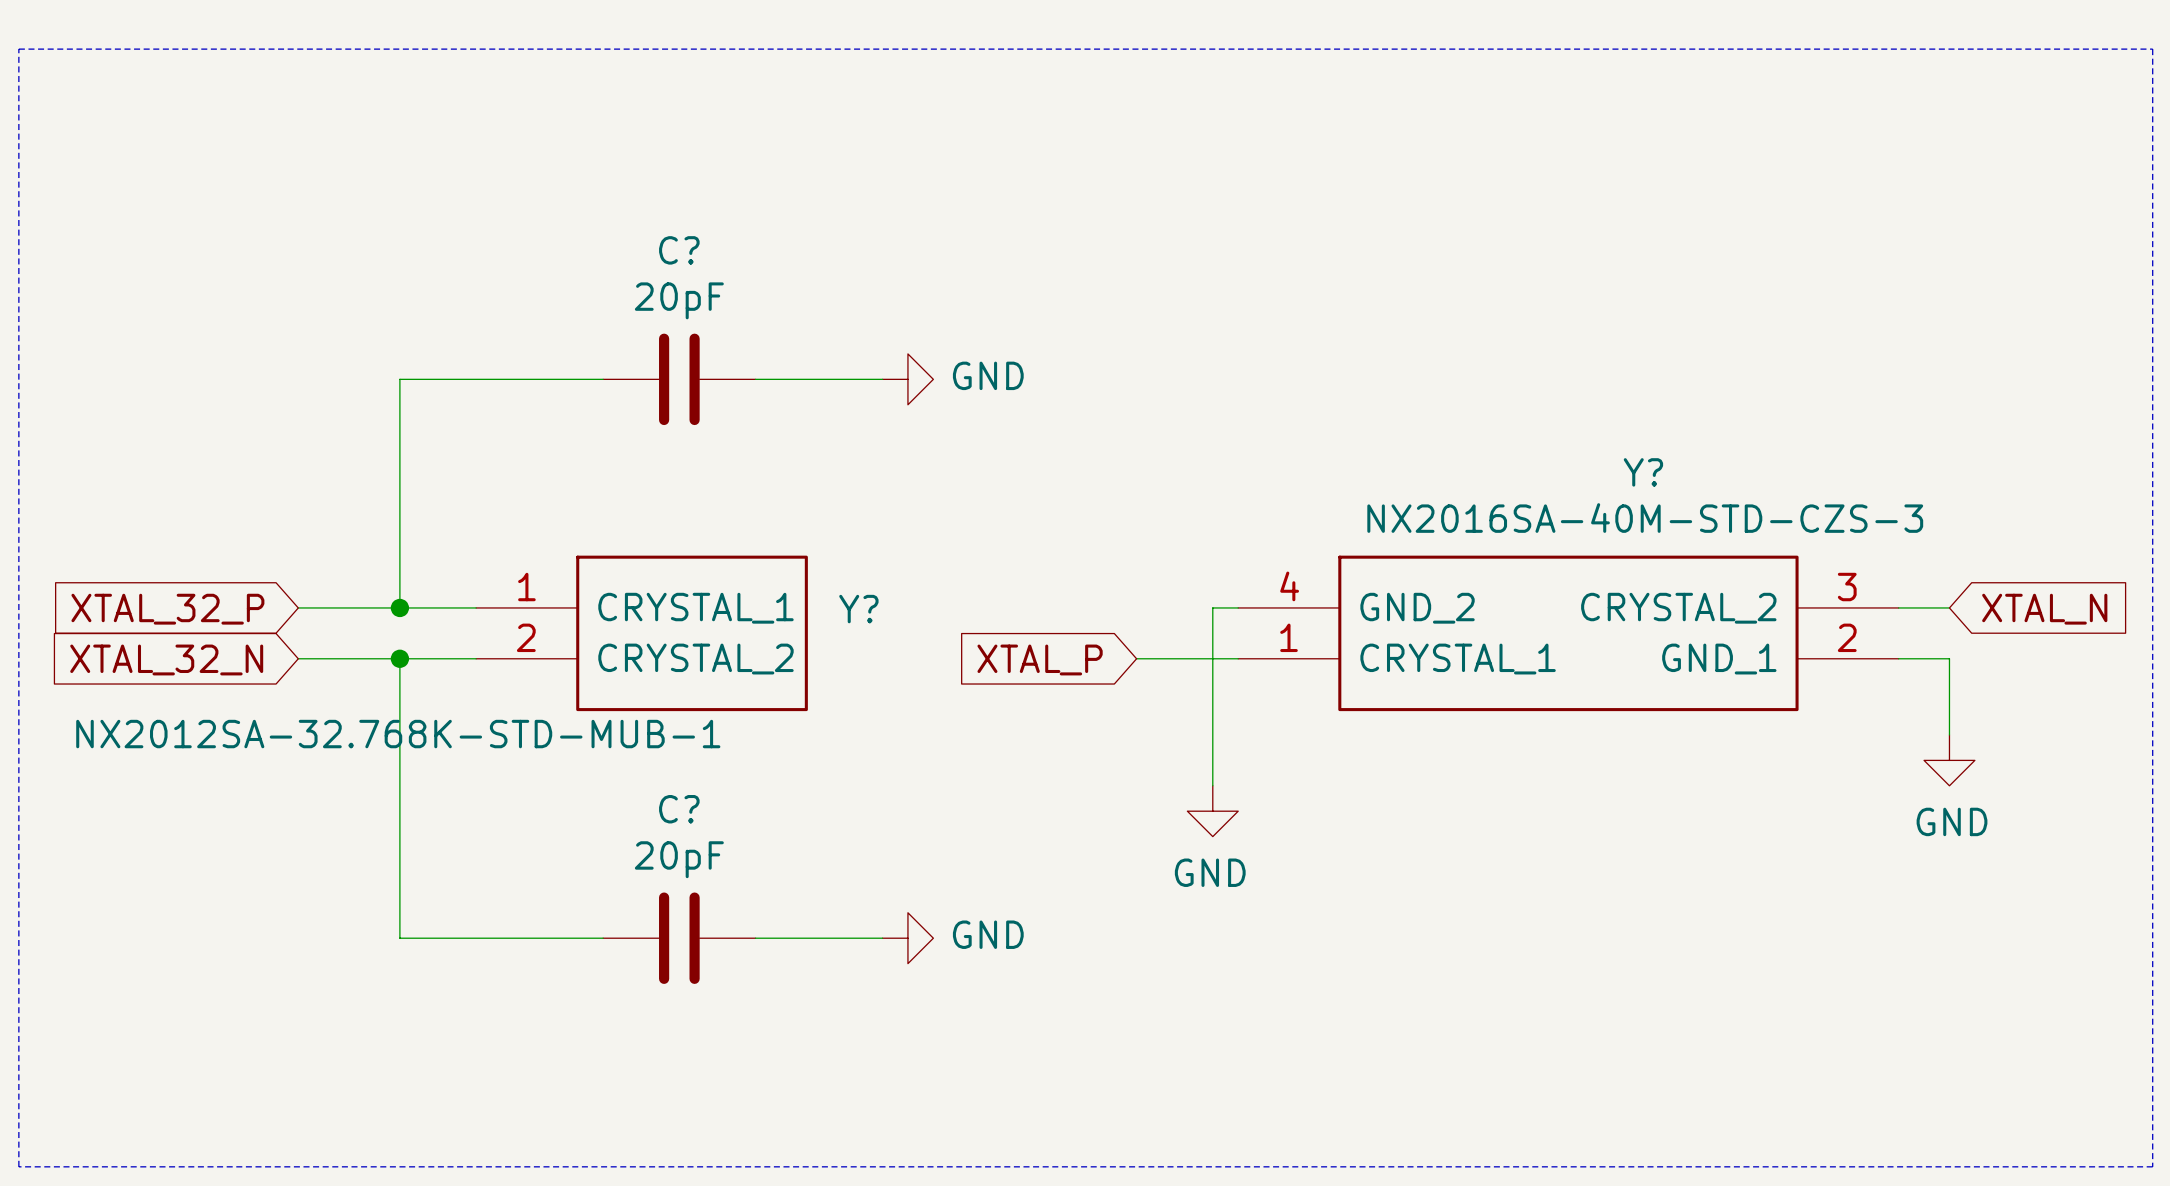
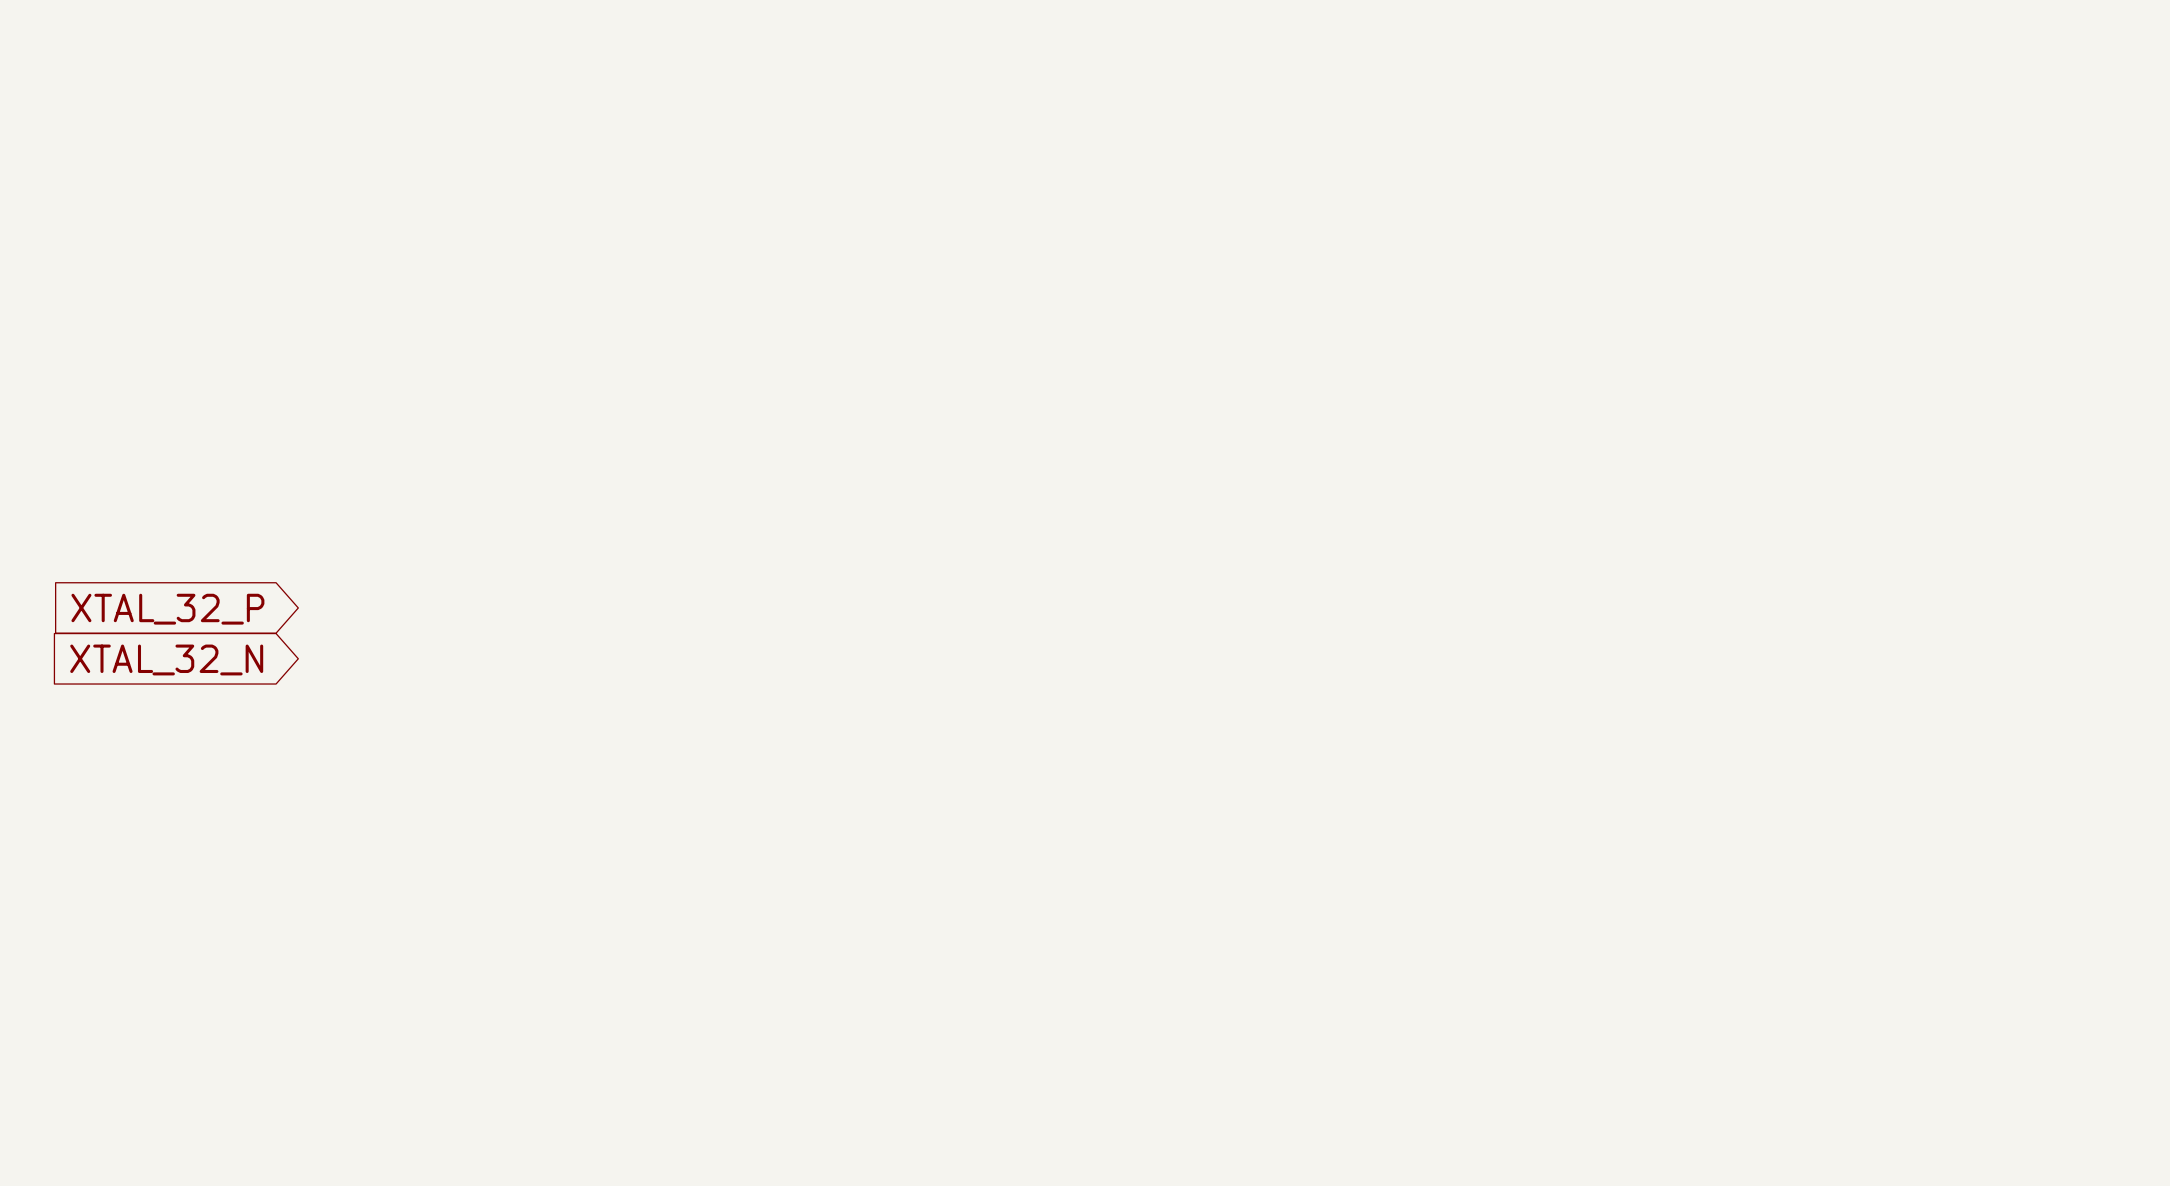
line: (18, 49) (2152, 49) (2152, 1166) (18, 1166) (18, 49) -> none
wire: (603, 379) (399, 379) (399, 607) -> none
C?: 20pF (679, 379) -> none
wire: (755, 379) (882, 379) -> none
power symbol: GND (907, 379) -> none
wire: (298, 607) (476, 607) -> none
junction: (399, 607) -> none
wire: (1238, 607) (1212, 607) (1212, 785) -> none
wire: (1898, 607) (1949, 607) -> none
global label: XTAL_N (2044, 609) -> none
Y?: NX2012SA-32.768K-STD-MUB-1 (641, 633) -> none
Y?: NX2016SA-40M-STD-CZS-3 (1568, 633) -> none
wire: (298, 658) (476, 658) -> none
wire: (399, 658) (399, 938) (603, 938) -> none
junction: (399, 658) -> none
wire: (1136, 658) (1238, 658) -> none
wire: (1898, 658) (1949, 658) (1949, 734) -> none
global label: XTAL_P (1040, 659) -> none
power symbol: GND (1949, 760) -> none
power symbol: GND (1212, 811) -> none
C?: 20pF (679, 938) -> none
wire: (755, 938) (882, 938) -> none
power symbol: GND (907, 938) -> none

